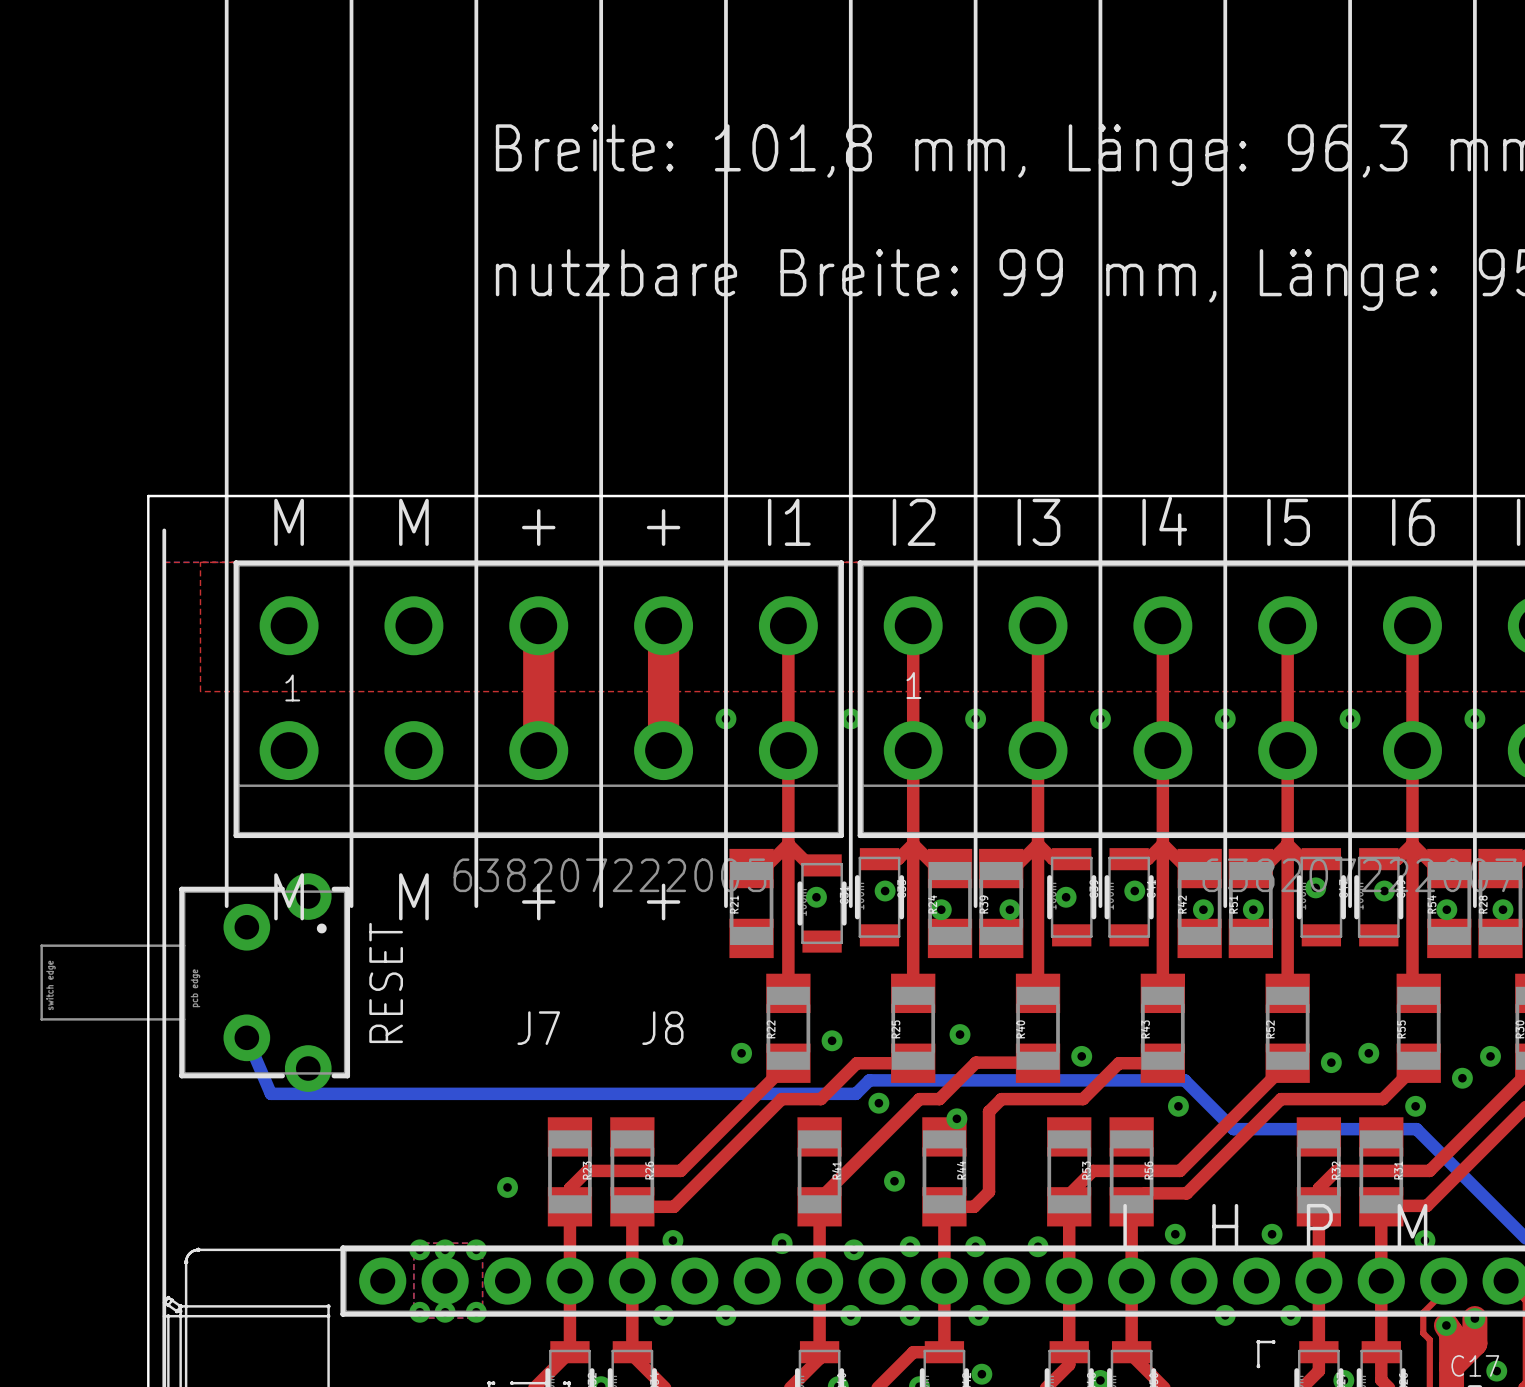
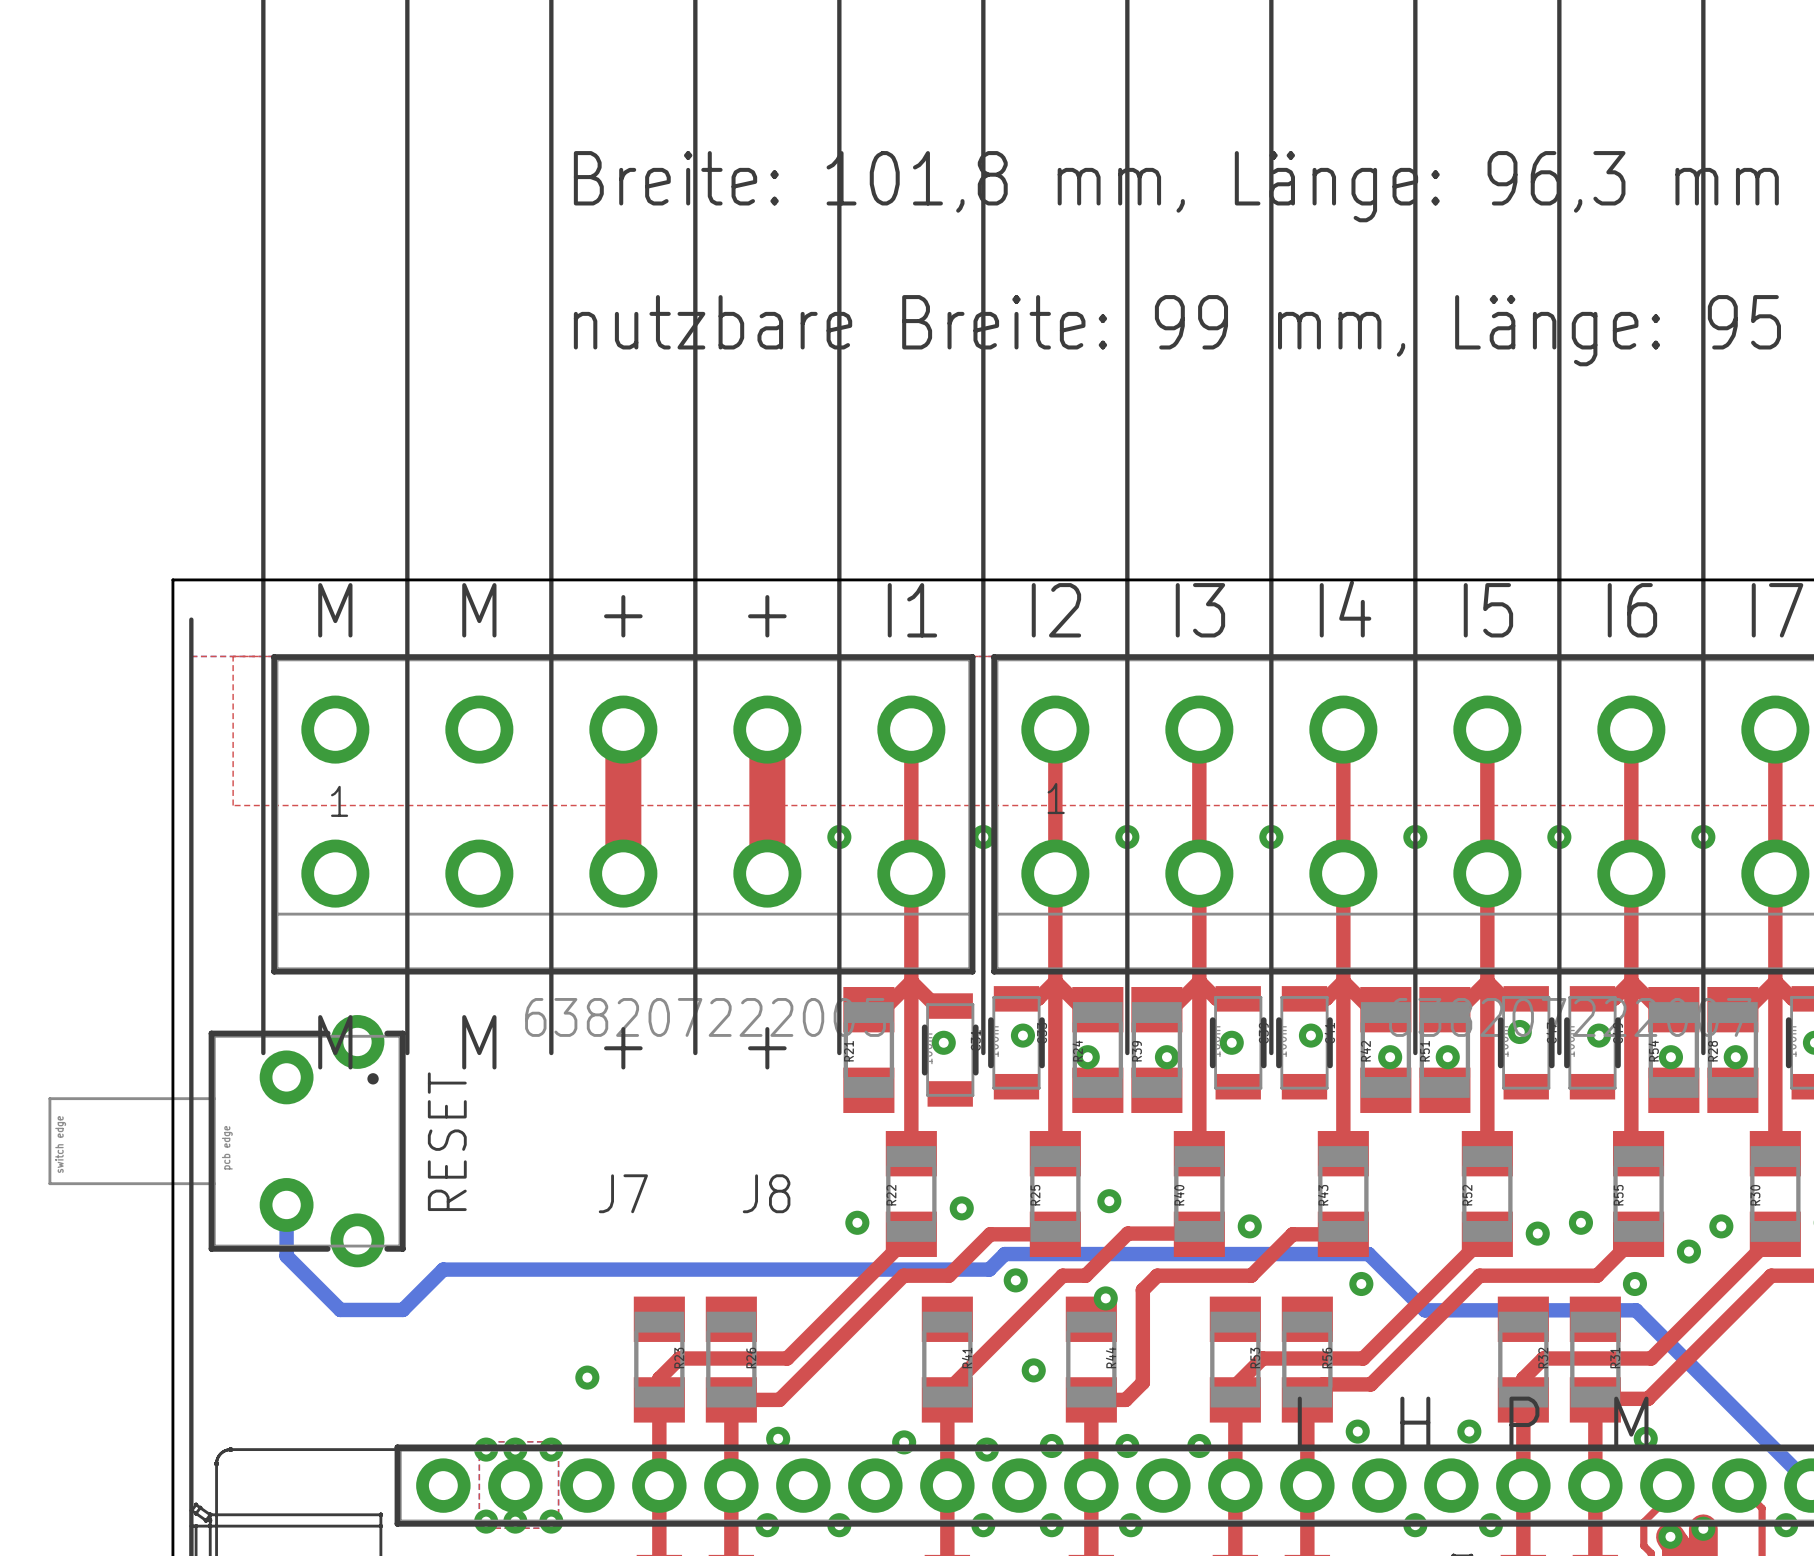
bottom track: (246, 1037) (270, 1093) (382, 1093) -> (286, 1204) (286, 1256) (340, 1309) (402, 1309) (443, 1269)

